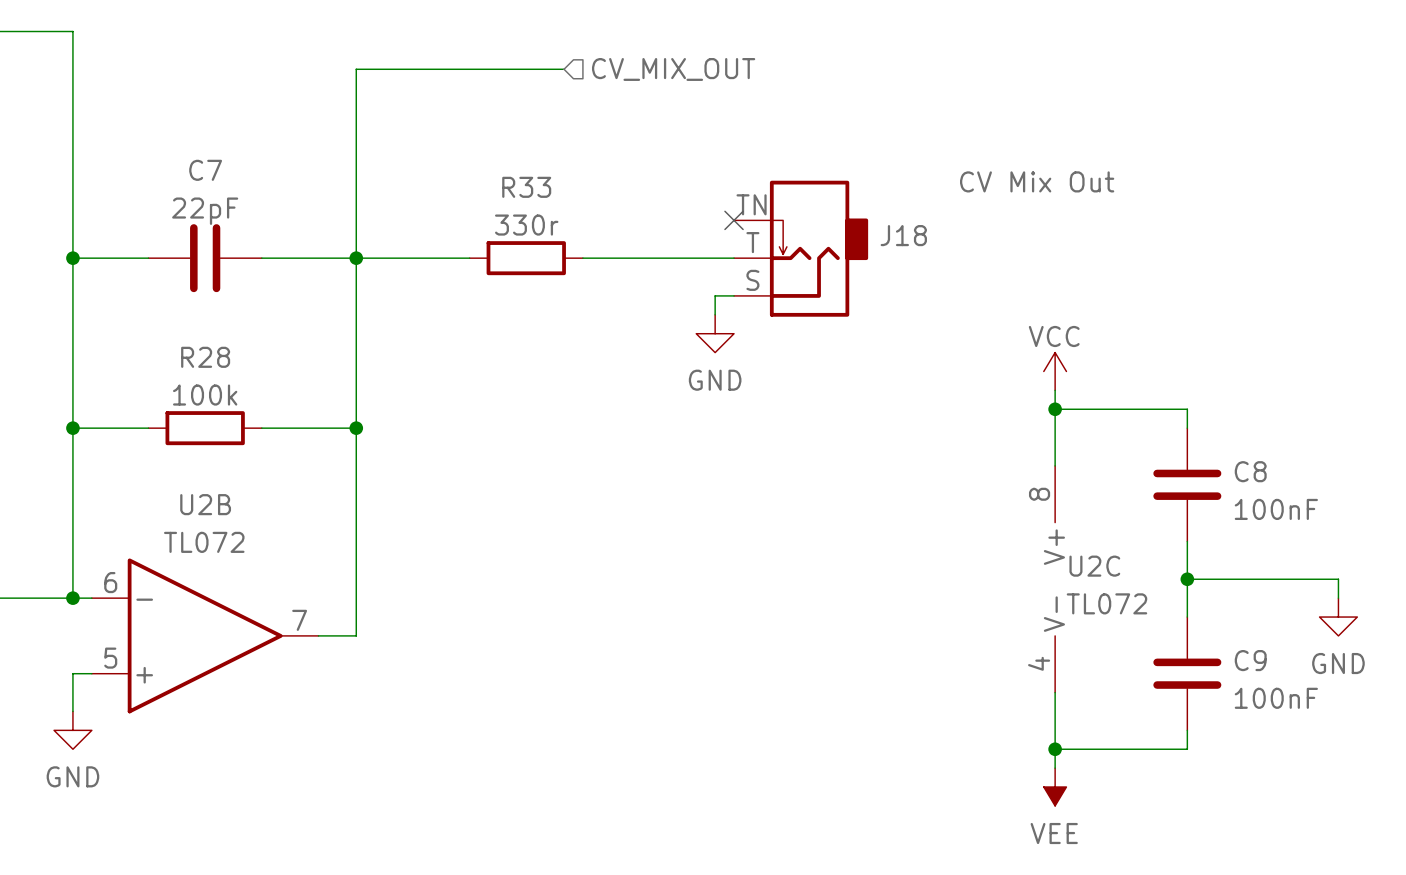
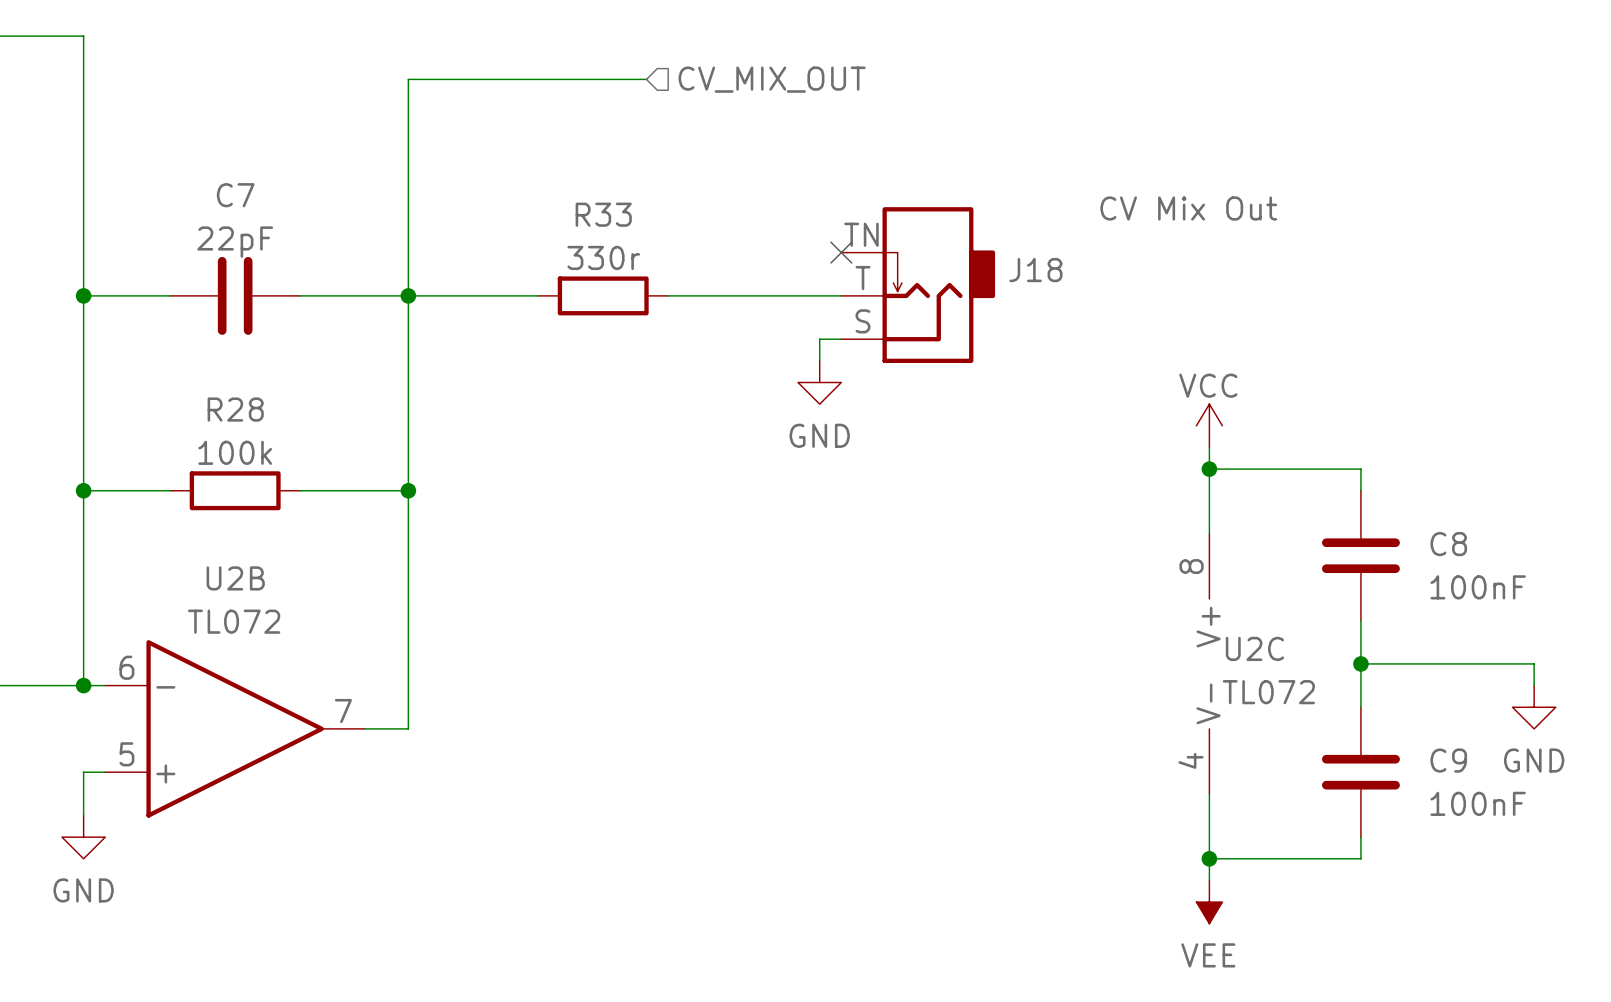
C8 name position: C8 (1250, 471) -> C8 (1448, 544)
C8 value position: 100nF (1276, 509) -> 100nF (1478, 587)
C9 name position: C9 (1250, 660) -> C9 (1448, 760)
C9 value position: 100nF (1276, 698) -> 100nF (1478, 803)

